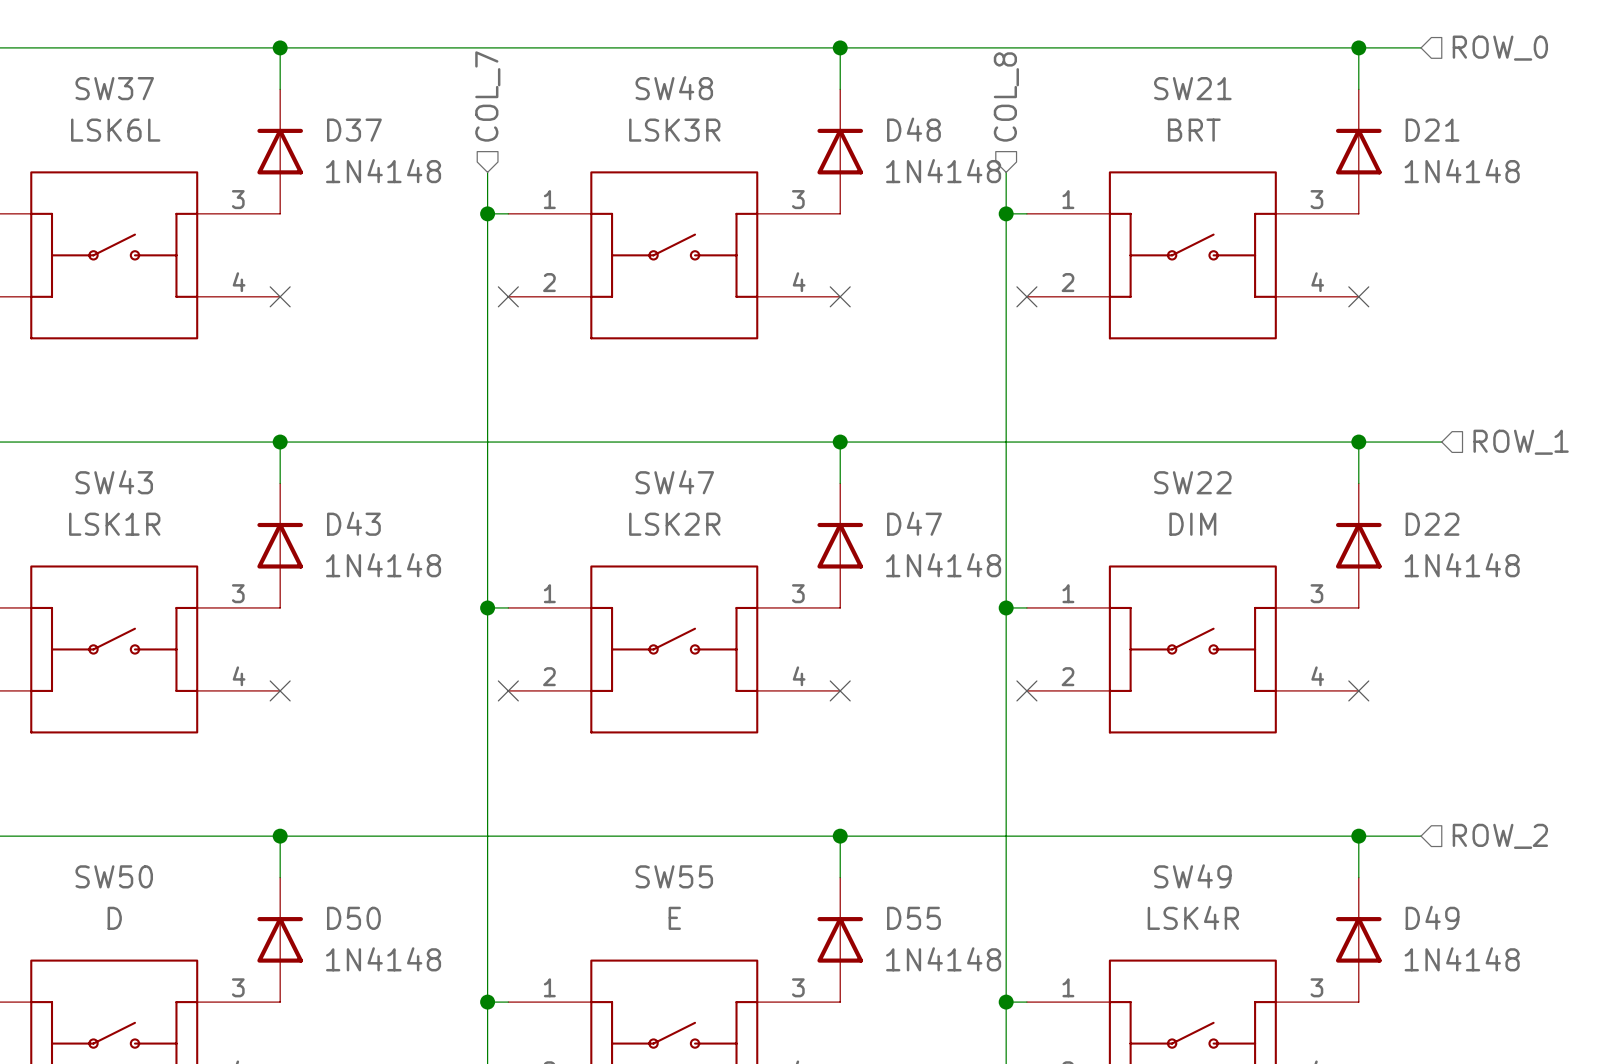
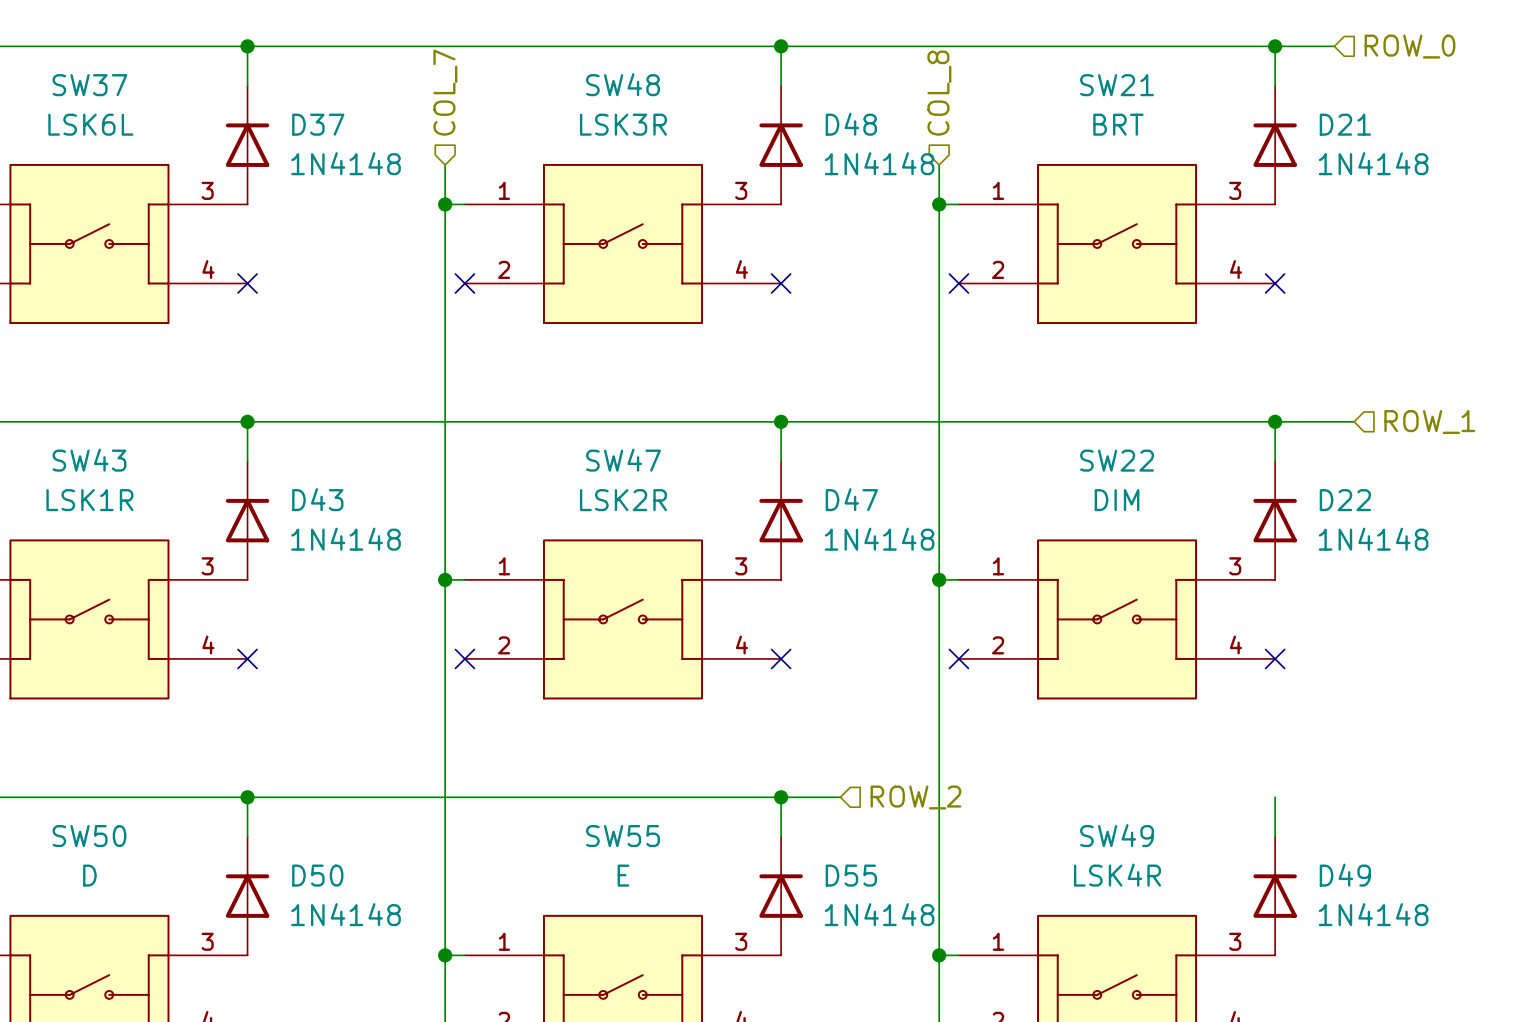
wire: (902, 836) (1421, 836) -> none
hierarchical label: none -> ROW_2 (915, 797)
junction: (1358, 836) -> none
hierarchical label: ROW_2 (1500, 836) -> none

